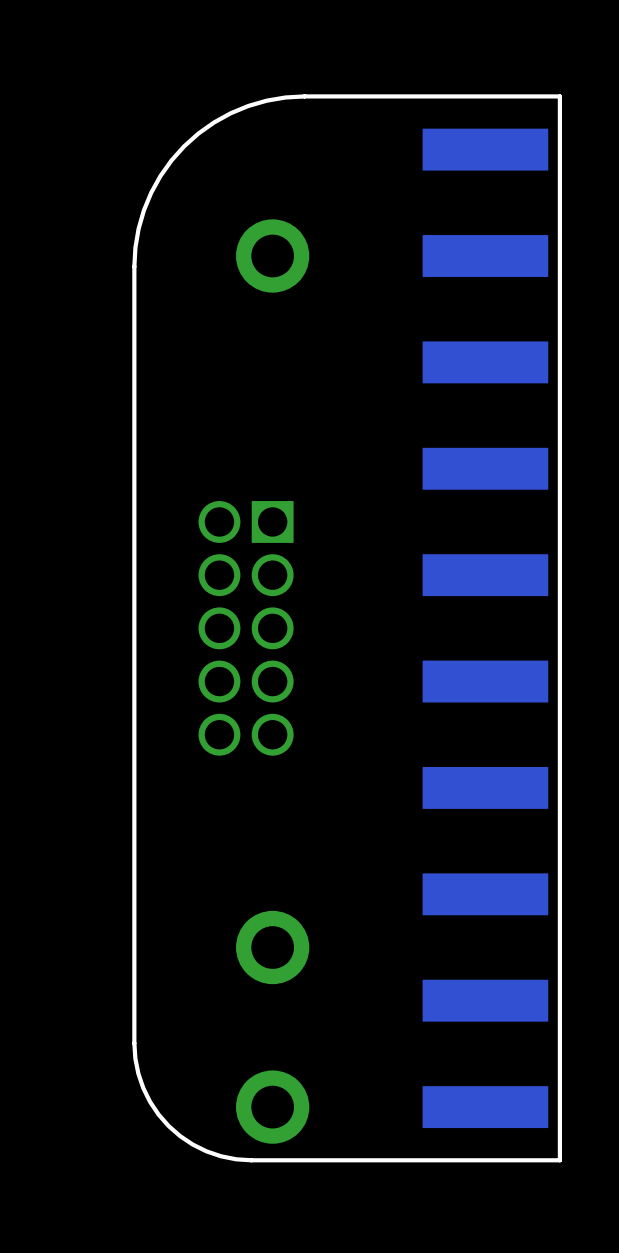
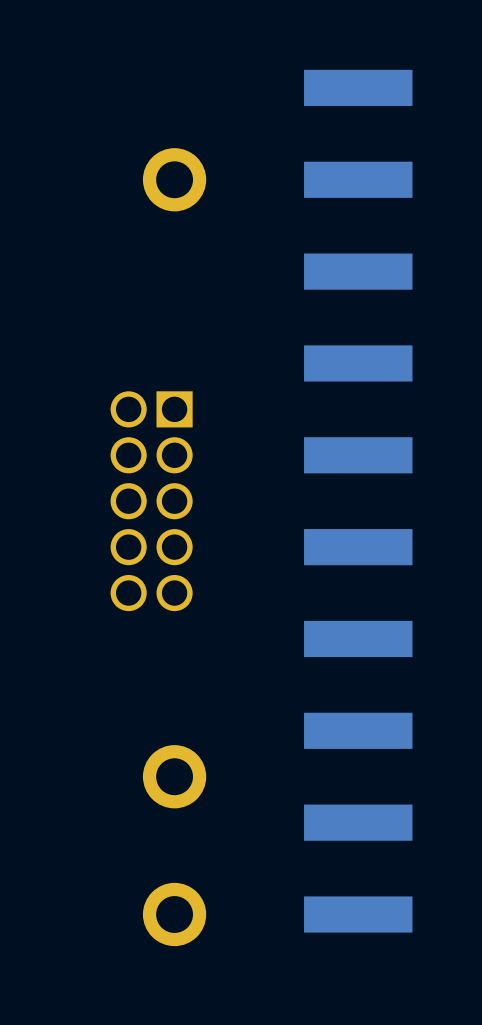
board edge: (559, 96) (559, 1160) (251, 1160) (221, 1156) (192, 1144) (180, 1136) (158, 1114) (143, 1088) (135, 1058) (134, 266) (135, 247) (143, 210) (160, 176) (184, 146) (214, 122) (248, 105) (266, 100) (304, 96) (559, 96) -> none

